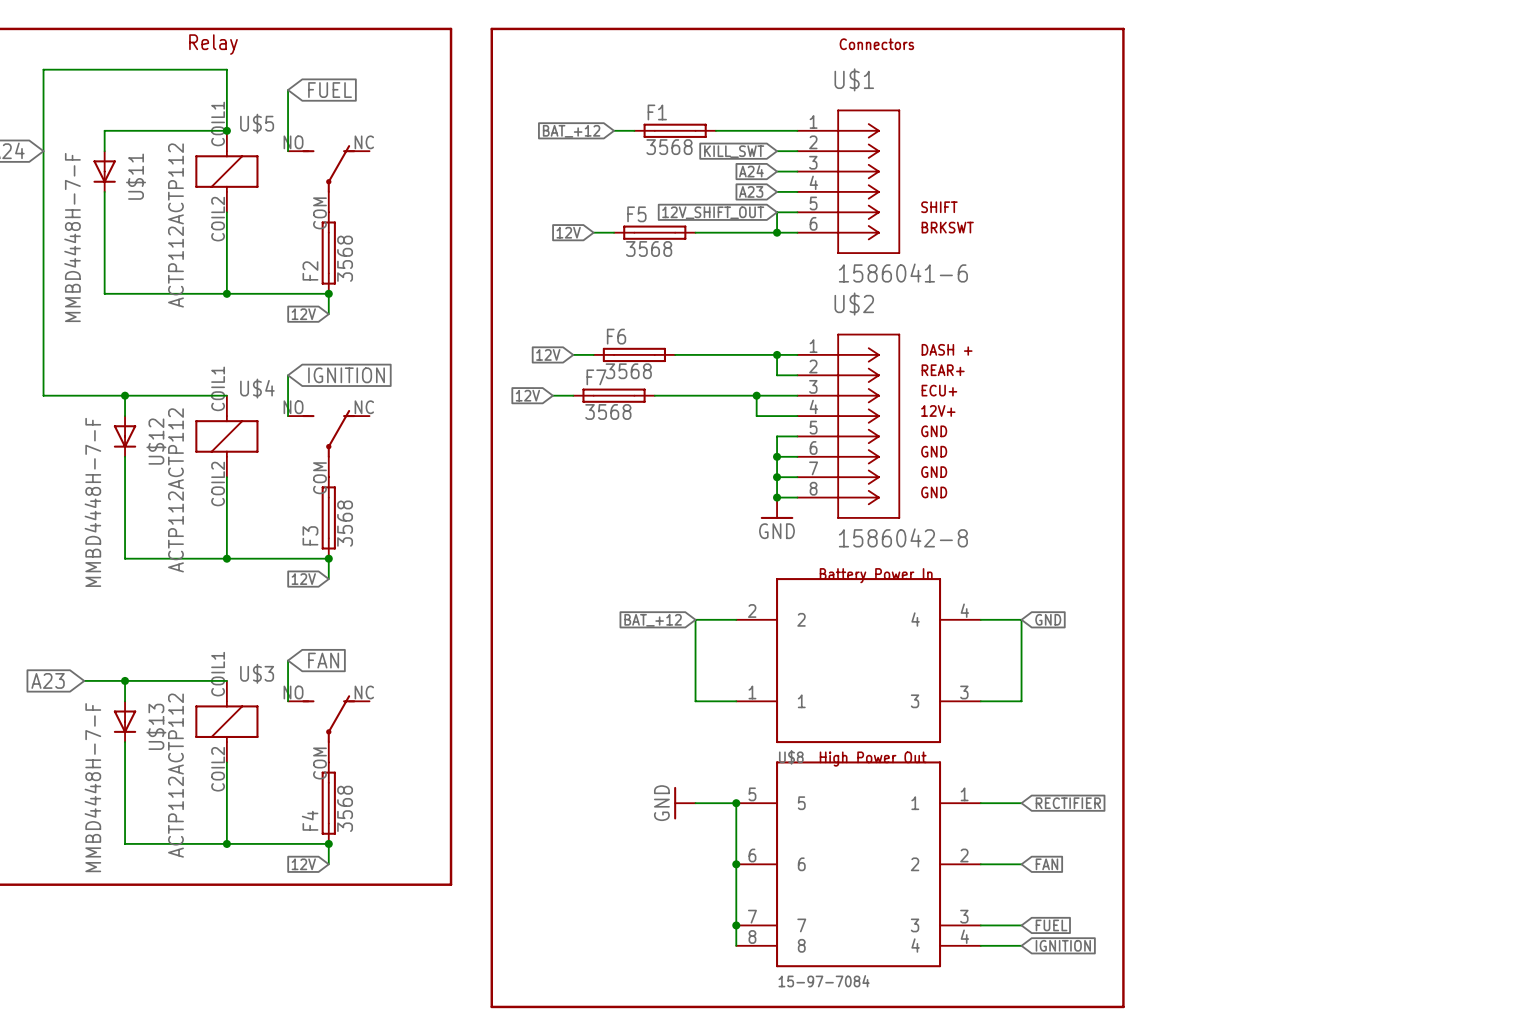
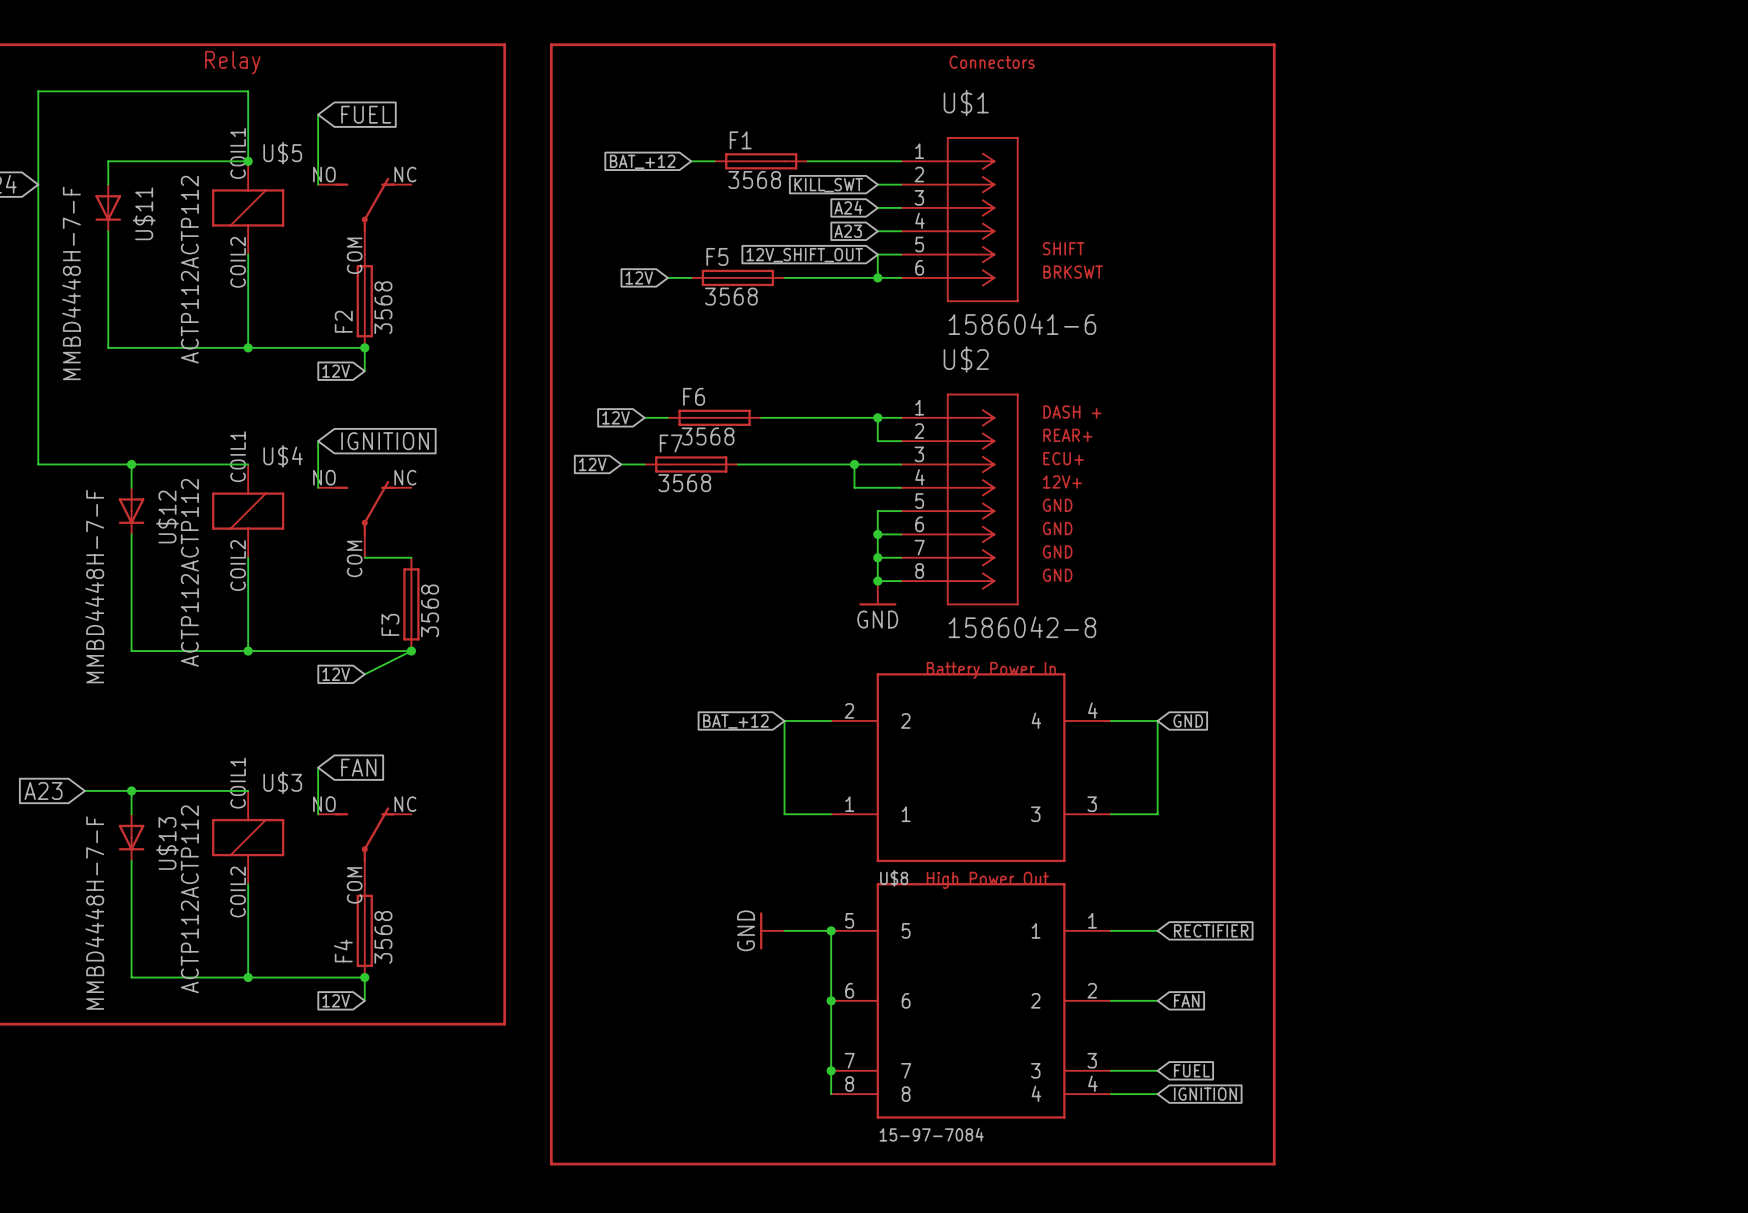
wire: none -> (364, 557) (411, 557)
F3 position: (328, 517) -> (411, 604)
wire: (328, 558) (328, 579) -> (364, 651) (411, 651) (364, 674)
junction position: (328, 558) -> (411, 651)

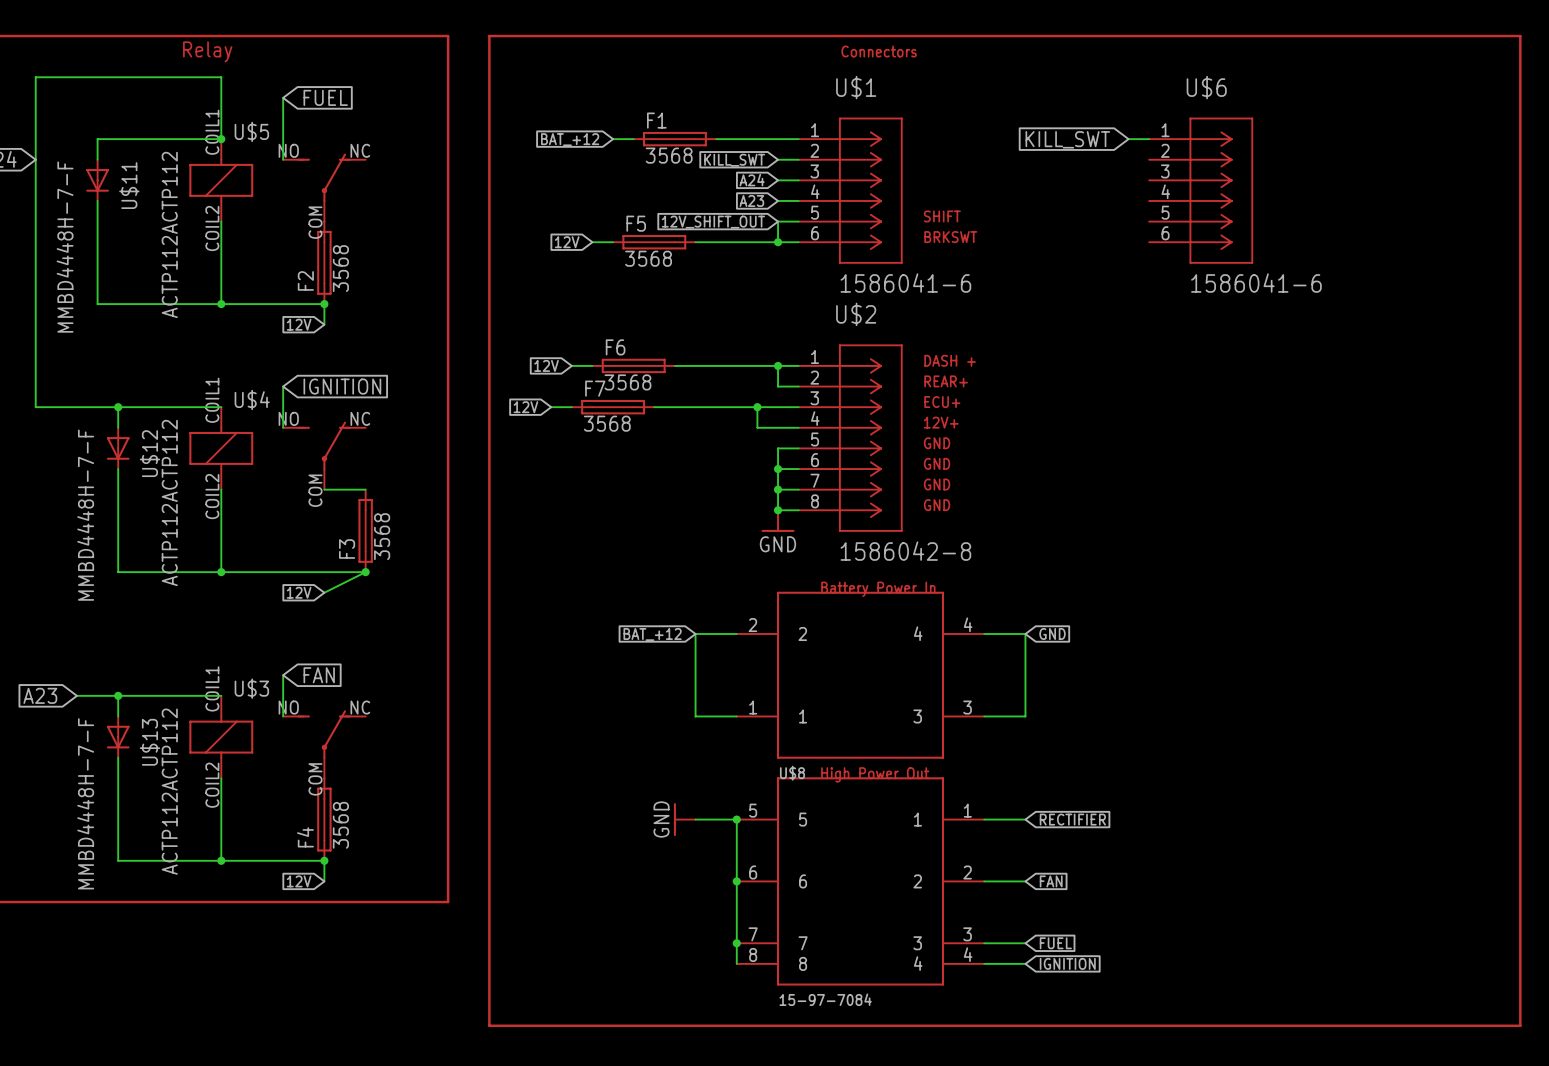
line: (1274, 44) (1274, 1164) -> (1128, 36) (1520, 36) (1520, 1025) (1128, 1025)
wire: none -> (1128, 139) (1149, 139)
global label: none -> KILL_SWT (1067, 139)
U$6: none -> 1586041-6 (1201, 190)

